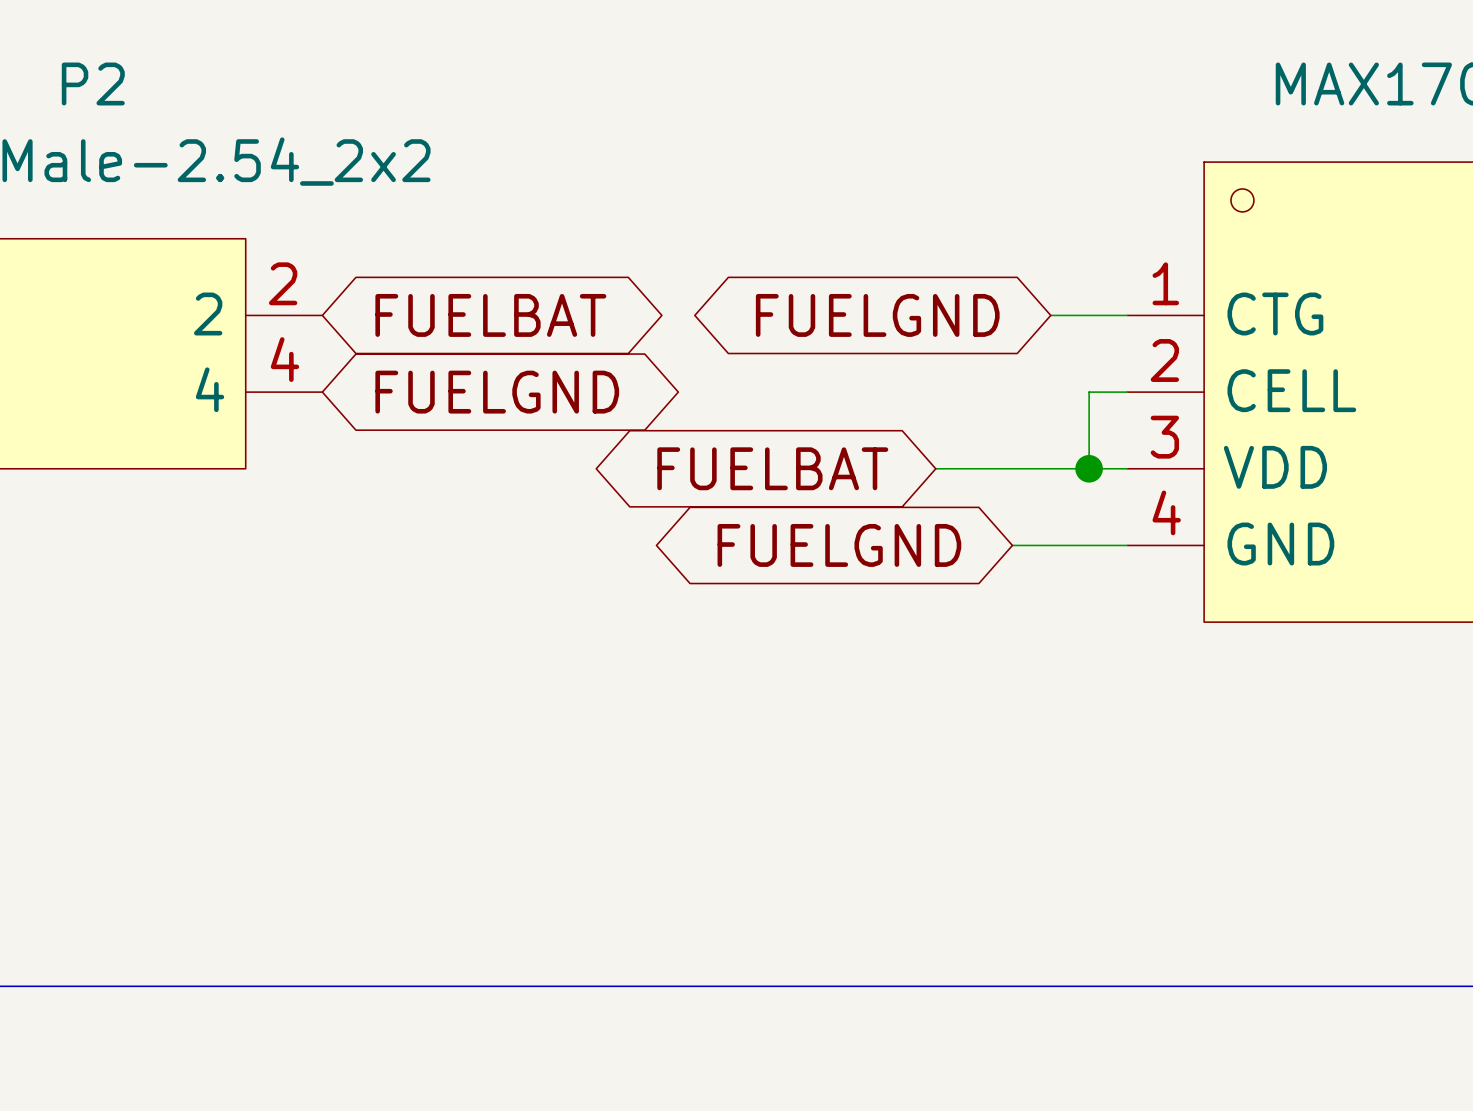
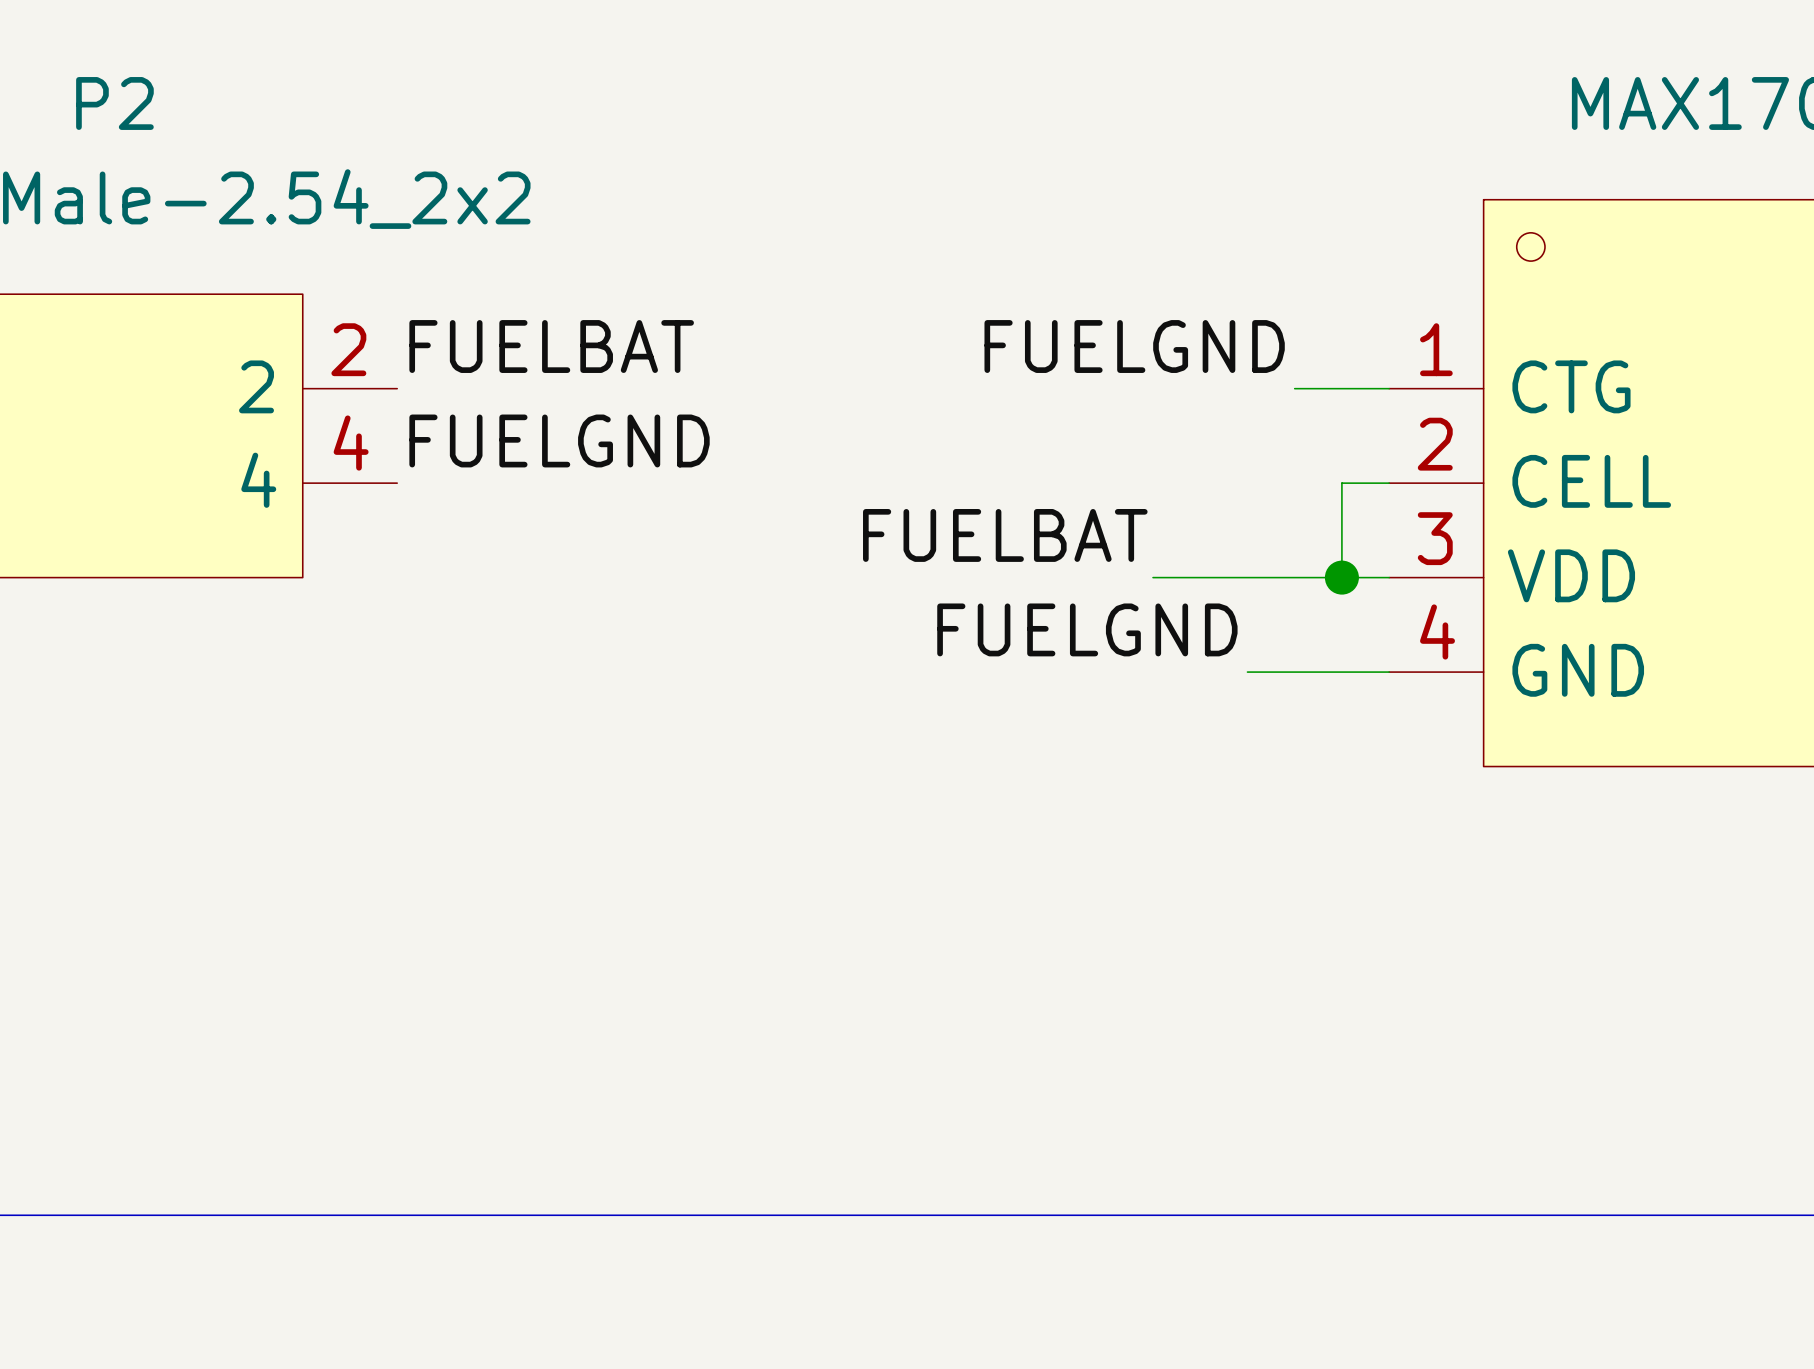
label: none -> FUELBAT (551, 346)
label: none -> FUELGND (1134, 346)
global label: FUELBAT (490, 315) -> none
global label: FUELGND (877, 315) -> none
label: none -> FUELGND (559, 440)
global label: FUELGND (497, 392) -> none
label: none -> FUELBAT (1005, 535)
global label: FUELBAT (772, 468) -> none
label: none -> FUELGND (1087, 629)
global label: FUELGND (839, 545) -> none

